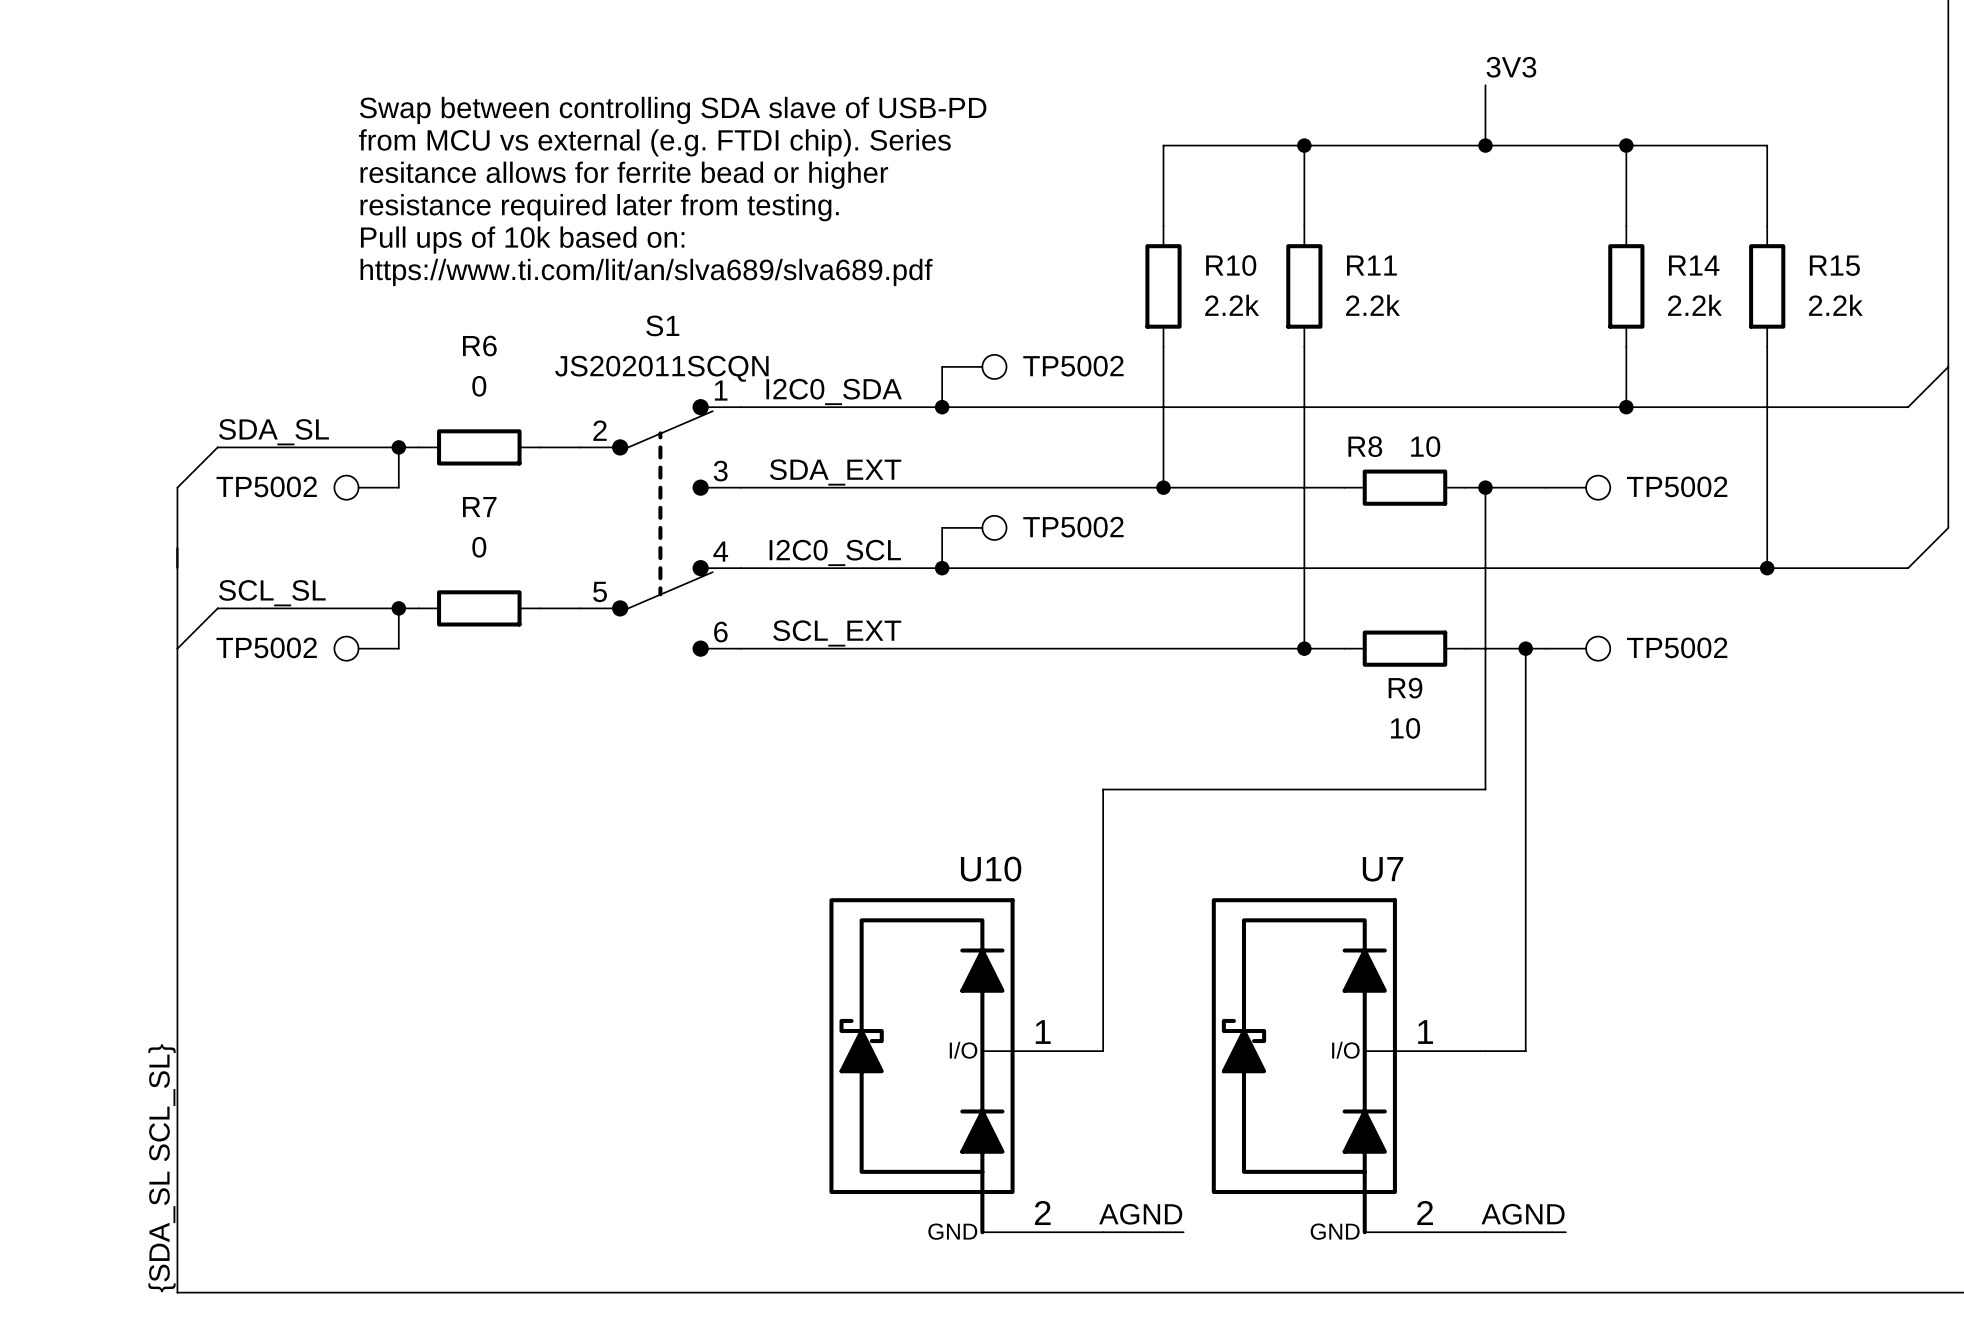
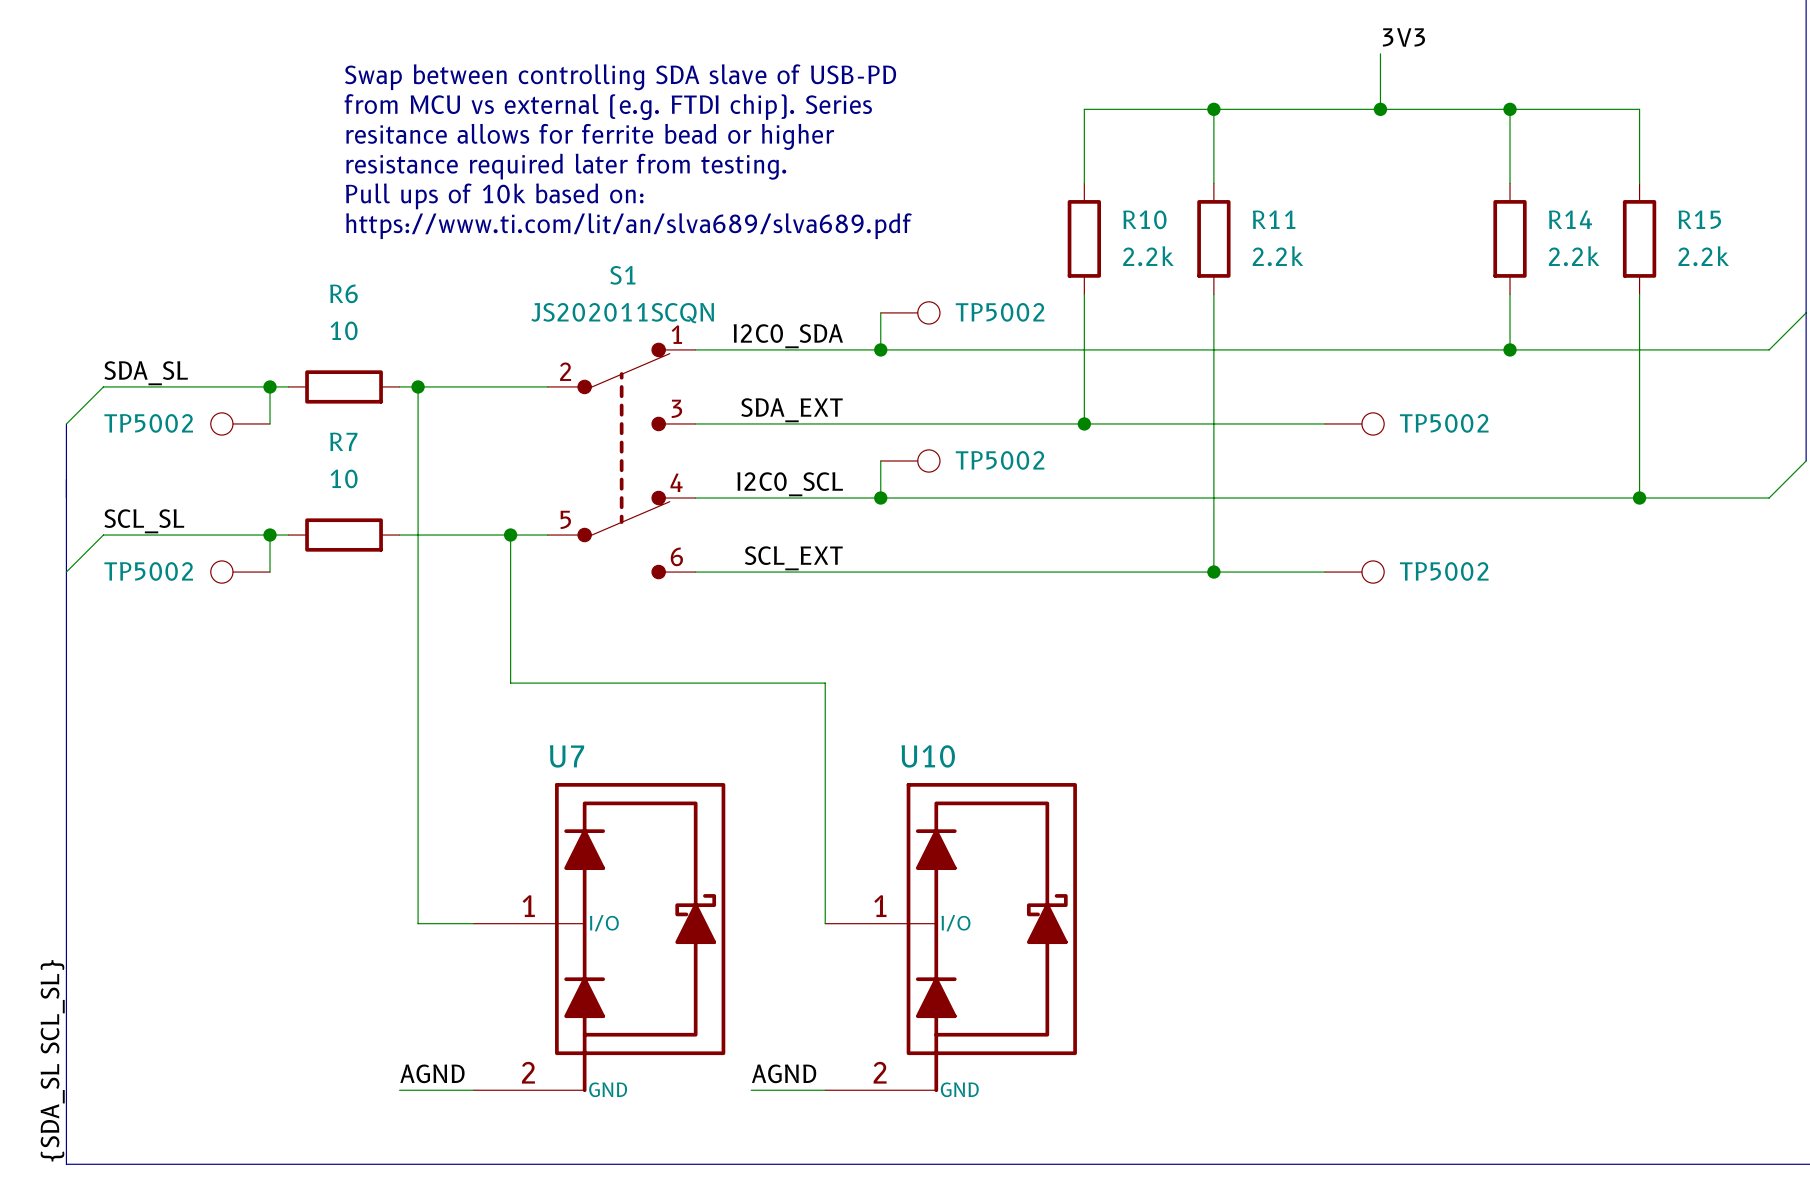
R6 value: 0 (479, 386) -> 10 (344, 330)
label position: SDA_SL (273, 432) -> SDA_SL (146, 373)
wire: (217, 447) (177, 487) -> (214, 386) (103, 386) (66, 423)
junction: none -> (270, 386)
wire: (298, 447) (418, 447) -> (510, 386) (399, 386)
wire: (398, 447) (398, 487) -> (270, 386) (270, 423)
junction position: (398, 447) -> (418, 386)
wire: none -> (418, 386) (418, 923) (473, 923)
R6 position: (479, 447) -> (344, 386)
bus: (177, 487) (177, 1292) -> (66, 423) (66, 1164) (177, 1164)
part: none -> TP5002 (240, 423)
part: TP5002 (366, 487) -> none
R8: 10 (1404, 487) -> none
part: none -> TP5002 (1354, 423)
wire: (1465, 487) (1545, 487) -> (1250, 423) (1324, 423)
wire: (1485, 487) (1485, 789) (1103, 789) (1103, 1051) -> none
junction: (1485, 487) -> none
part: TP5002 (1578, 487) -> none
R7 value: 0 (479, 547) -> 10 (344, 478)
label position: SCL_SL (272, 593) -> SCL_SL (144, 521)
wire: (217, 608) (177, 648) -> (214, 535) (103, 535) (66, 572)
junction: none -> (270, 535)
wire: (298, 608) (418, 608) -> (825, 923) (825, 683) (510, 683) (510, 535) (399, 535)
wire: (398, 608) (398, 648) -> (270, 535) (270, 572)
junction: (398, 608) -> none
R7 position: (479, 608) -> (344, 535)
junction: none -> (510, 535)
part: none -> TP5002 (240, 572)
part: TP5002 (366, 648) -> none
R9: 10 (1404, 648) -> none
part: none -> TP5002 (1354, 572)
wire: (1465, 648) (1545, 648) -> (1250, 572) (1324, 572)
wire: (1525, 648) (1525, 1051) (1485, 1051) -> none
junction: (1525, 648) -> none
part: TP5002 (1578, 648) -> none
U10 flip: as is (922, 1066) -> left-right (991, 937)
U7 flip: as is (1304, 1066) -> left-right (640, 937)
U7 position: (1348, 1066) -> (599, 937)
label position: {SDA_SL SCL_SL} (161, 1168) -> {SDA_SL SCL_SL} (52, 1060)
label: none -> AGND (432, 1073)
label: none -> AGND (784, 1073)
wire: none -> (399, 1090) (473, 1090)
label: AGND (1140, 1214) -> none
label: AGND (1523, 1214) -> none
wire: (1103, 1232) (1183, 1232) -> (751, 1090) (825, 1090)
wire: (1485, 1232) (1565, 1232) -> none

